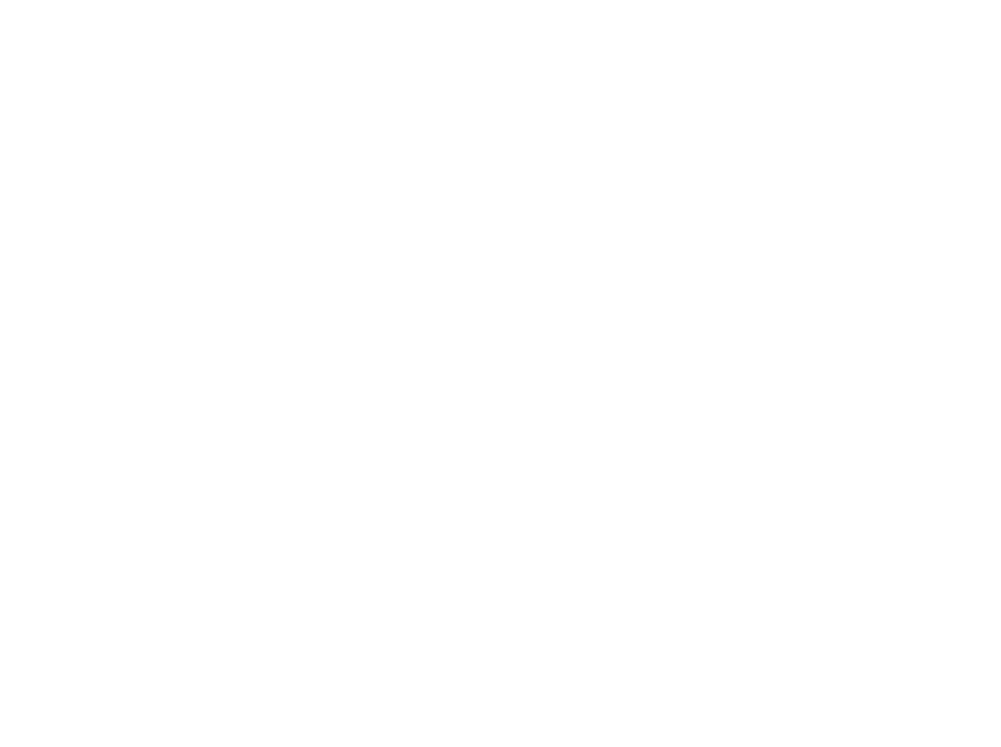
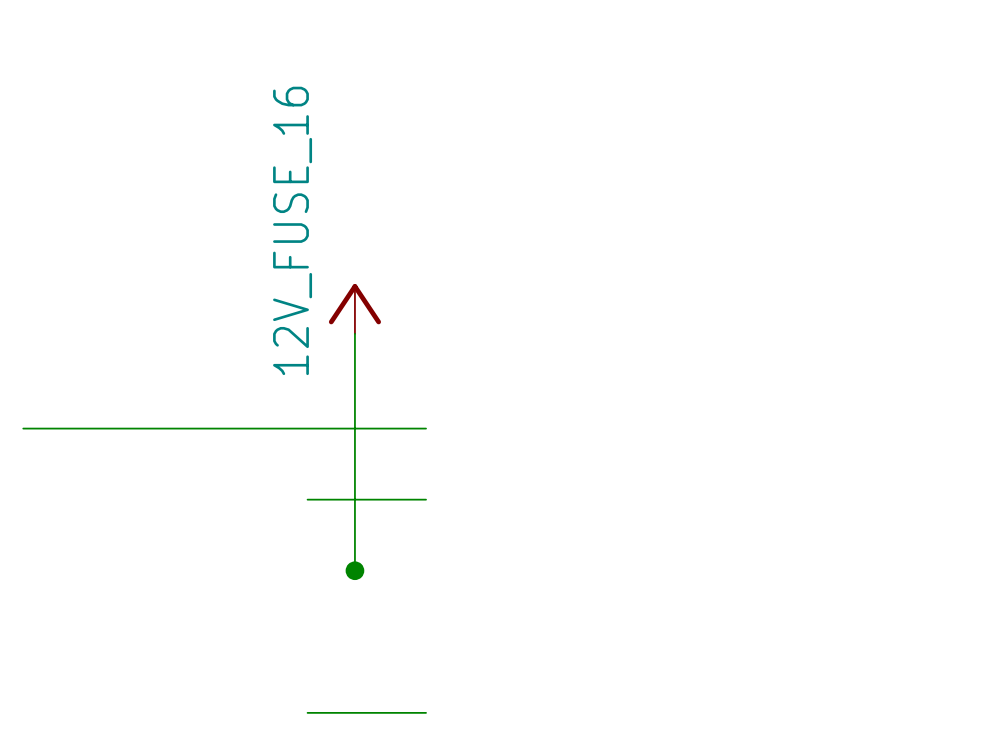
power symbol: none -> 12V_FUSE_16 (354, 308)
wire: none -> (354, 333) (354, 570)
wire: none -> (23, 428) (426, 428)
wire: none -> (307, 499) (426, 499)
junction: none -> (354, 570)
wire: none -> (307, 712) (426, 712)

